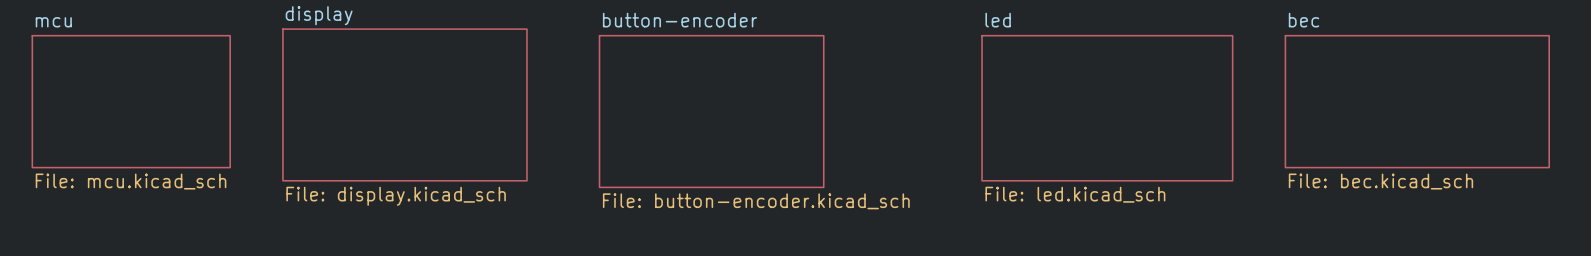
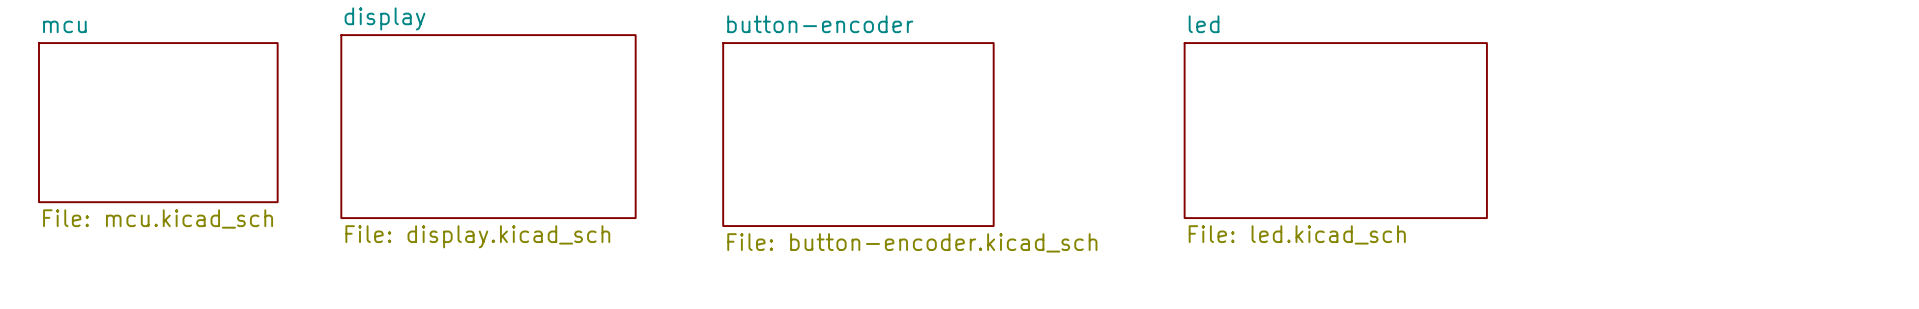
sheet bec: File: bec.kicad_sch (1417, 101) -> none

